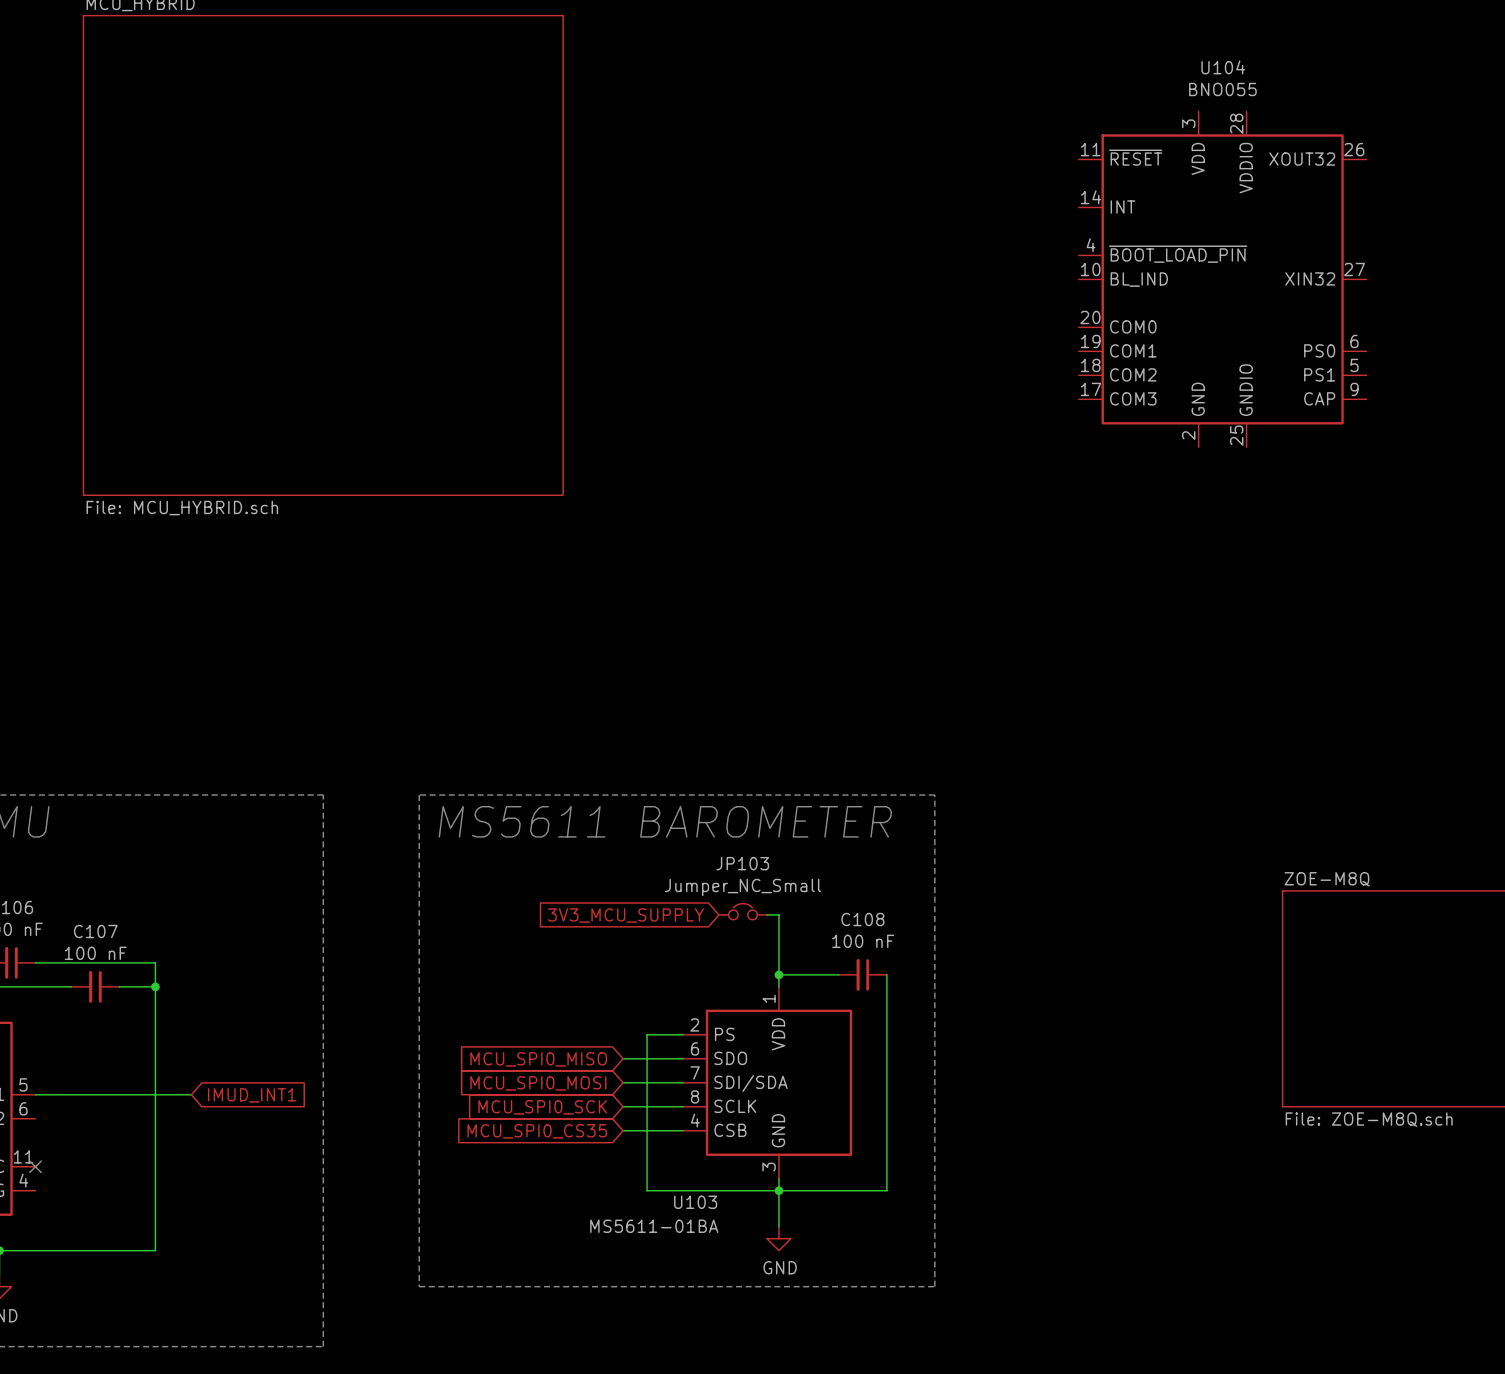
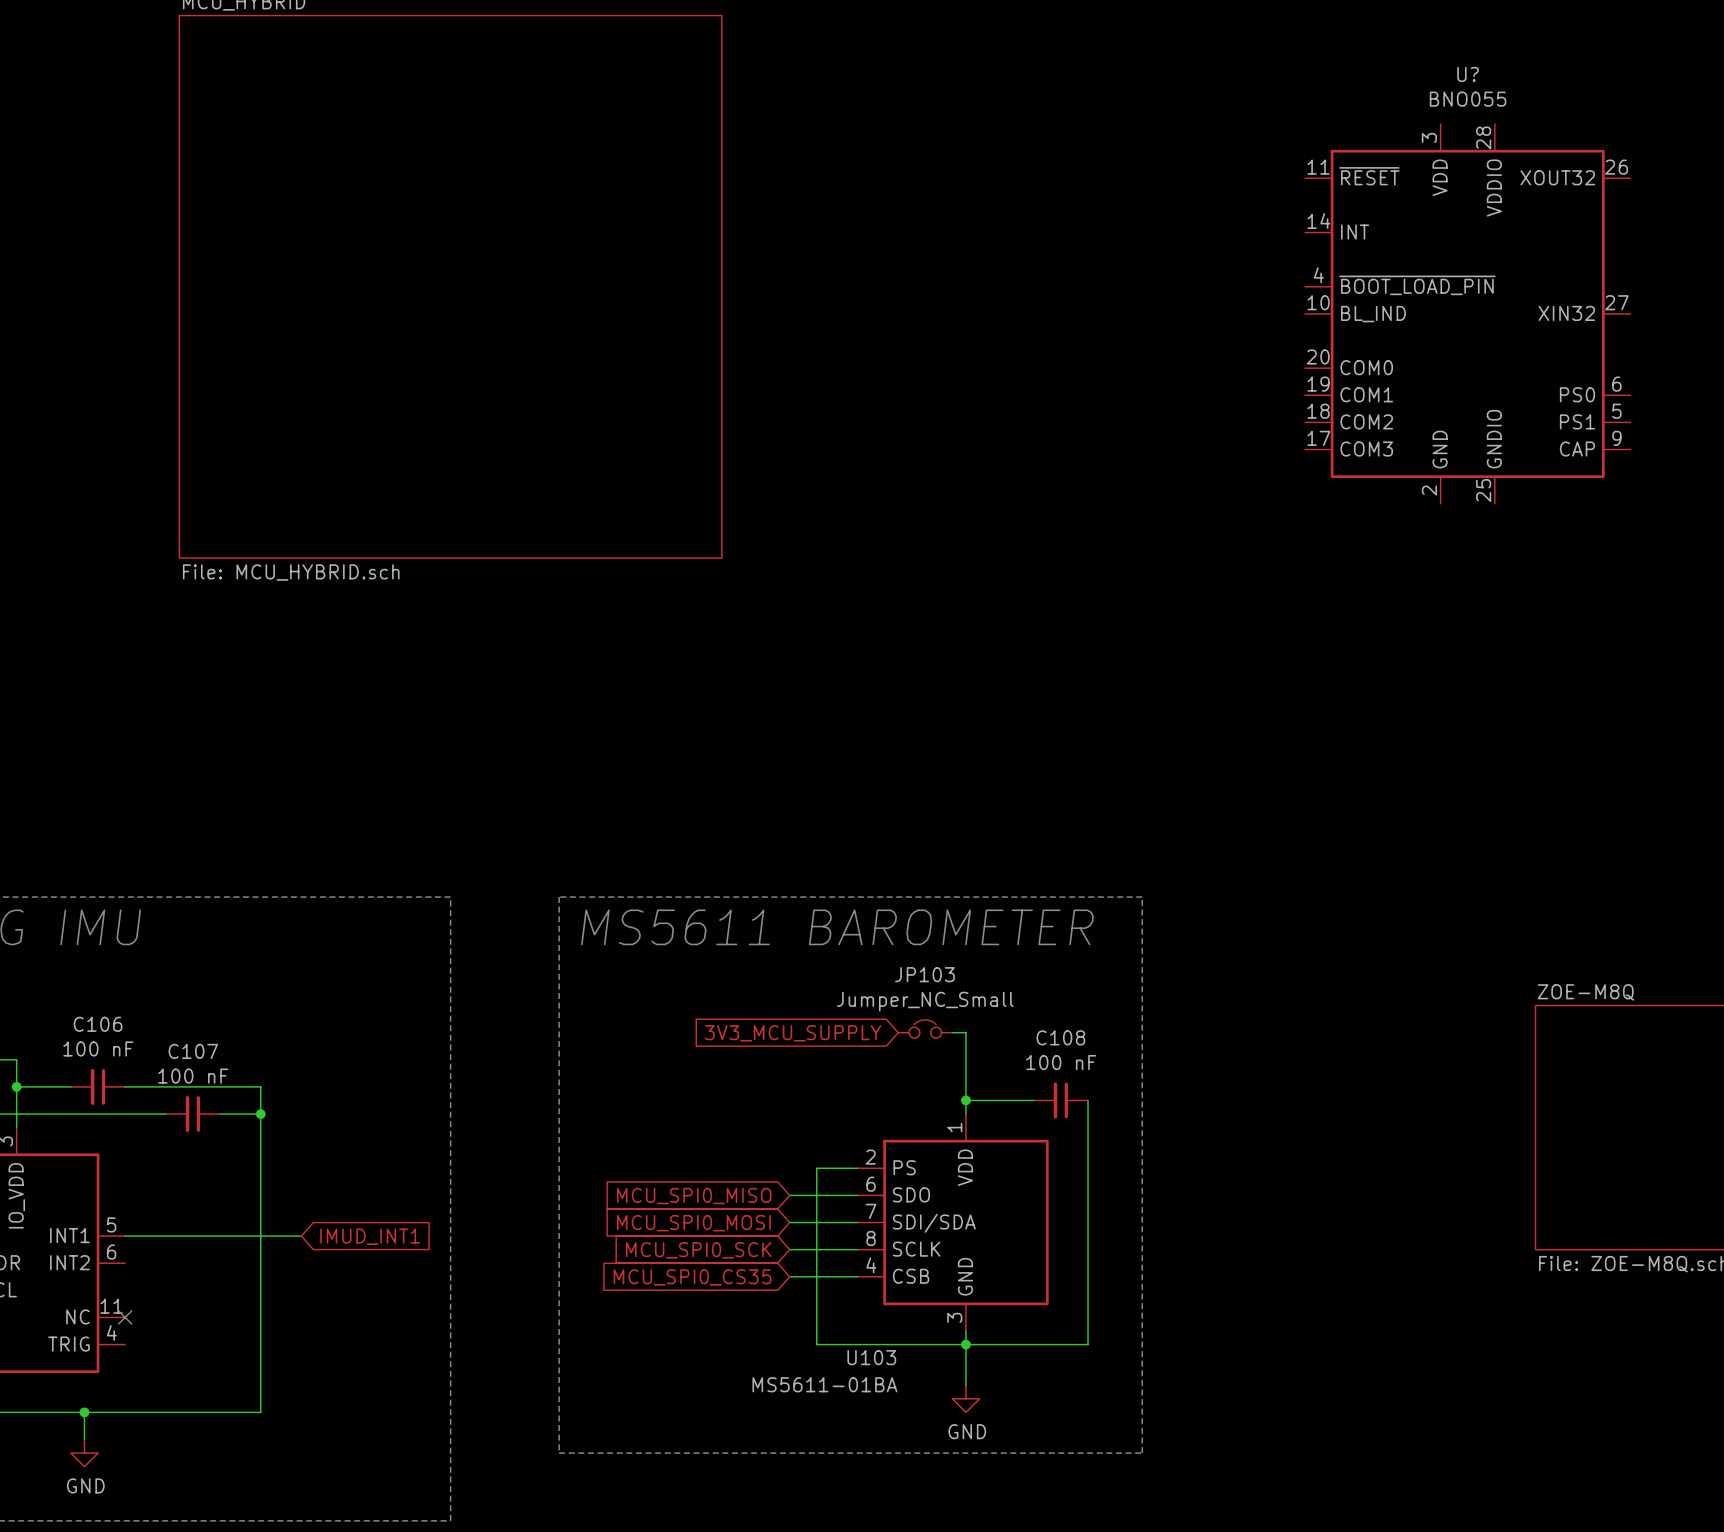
U104 name: U104 (1223, 67) -> U? (1468, 74)

